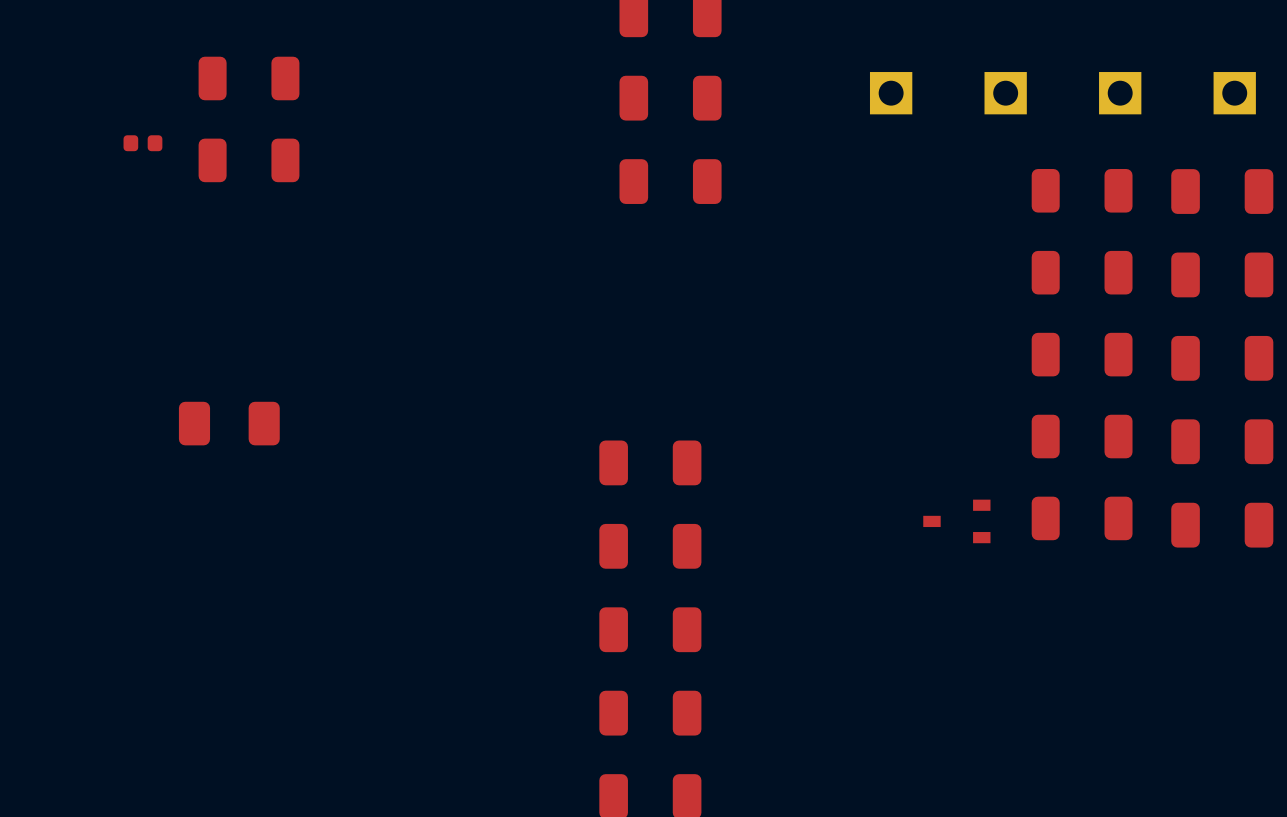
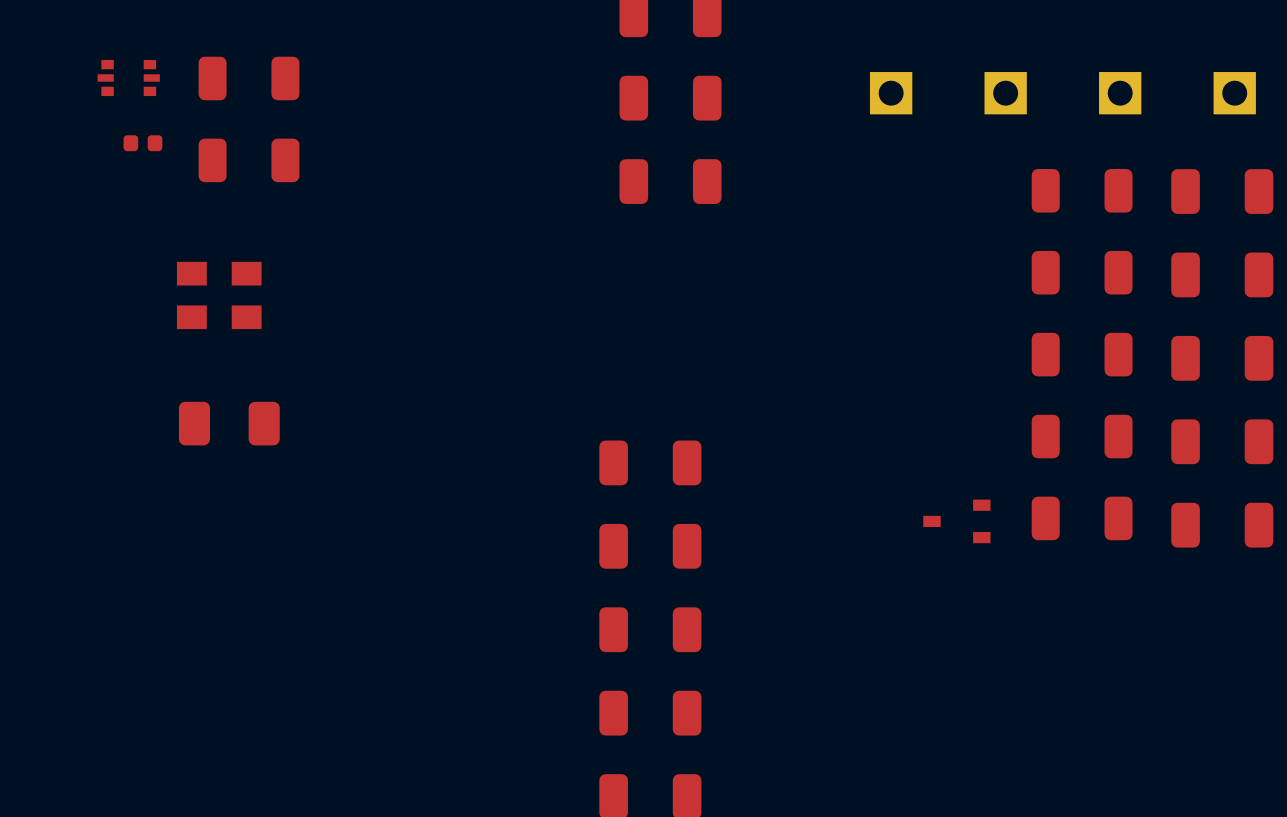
part: none -> (128, 77)
part: none -> (219, 295)

